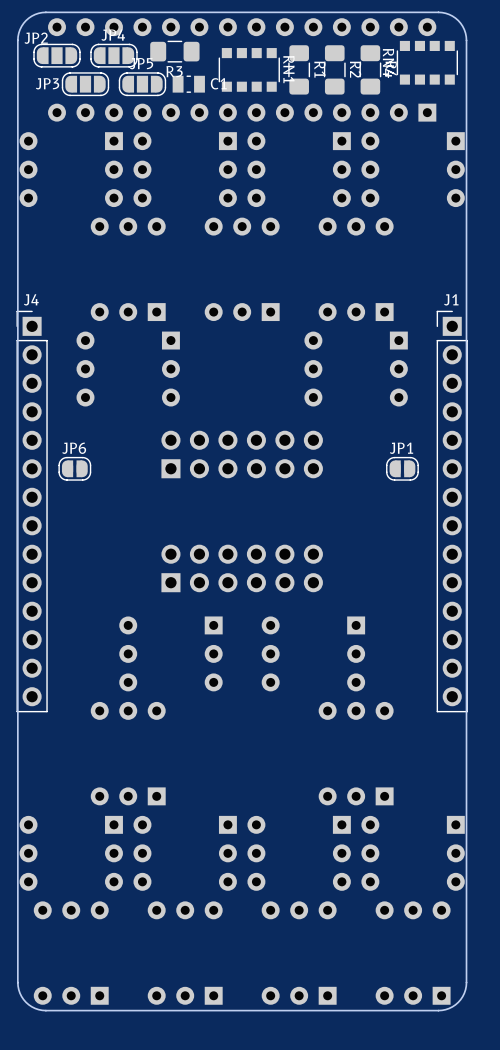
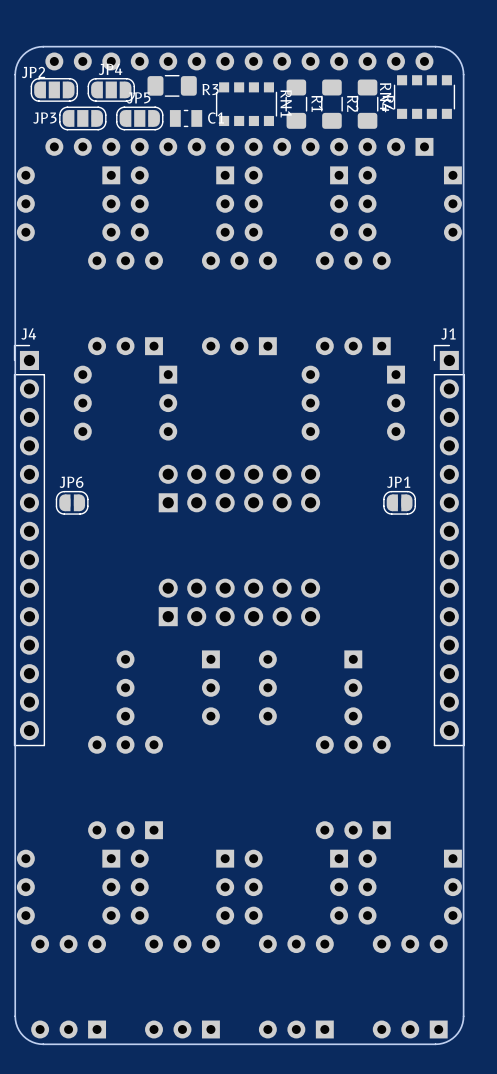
R3 name position: R3 (174, 71) -> R3 (210, 89)

